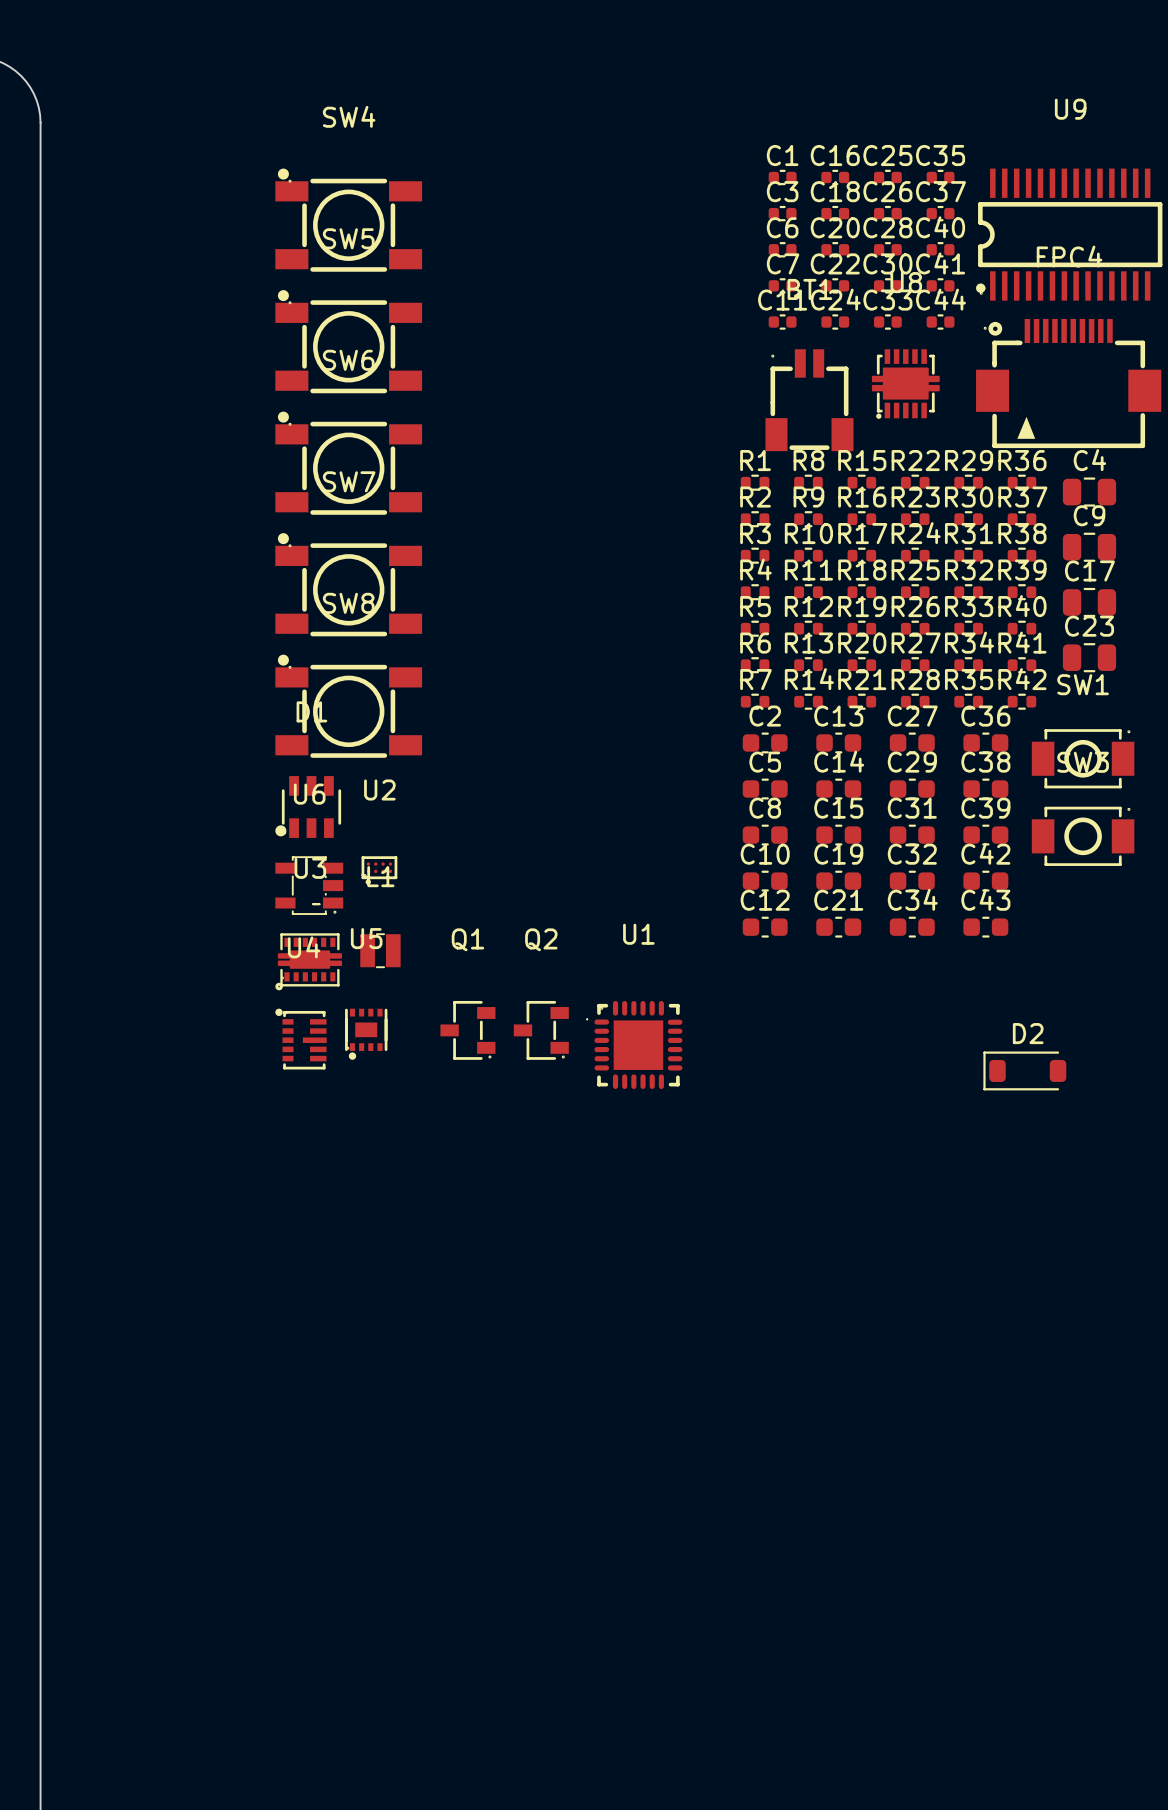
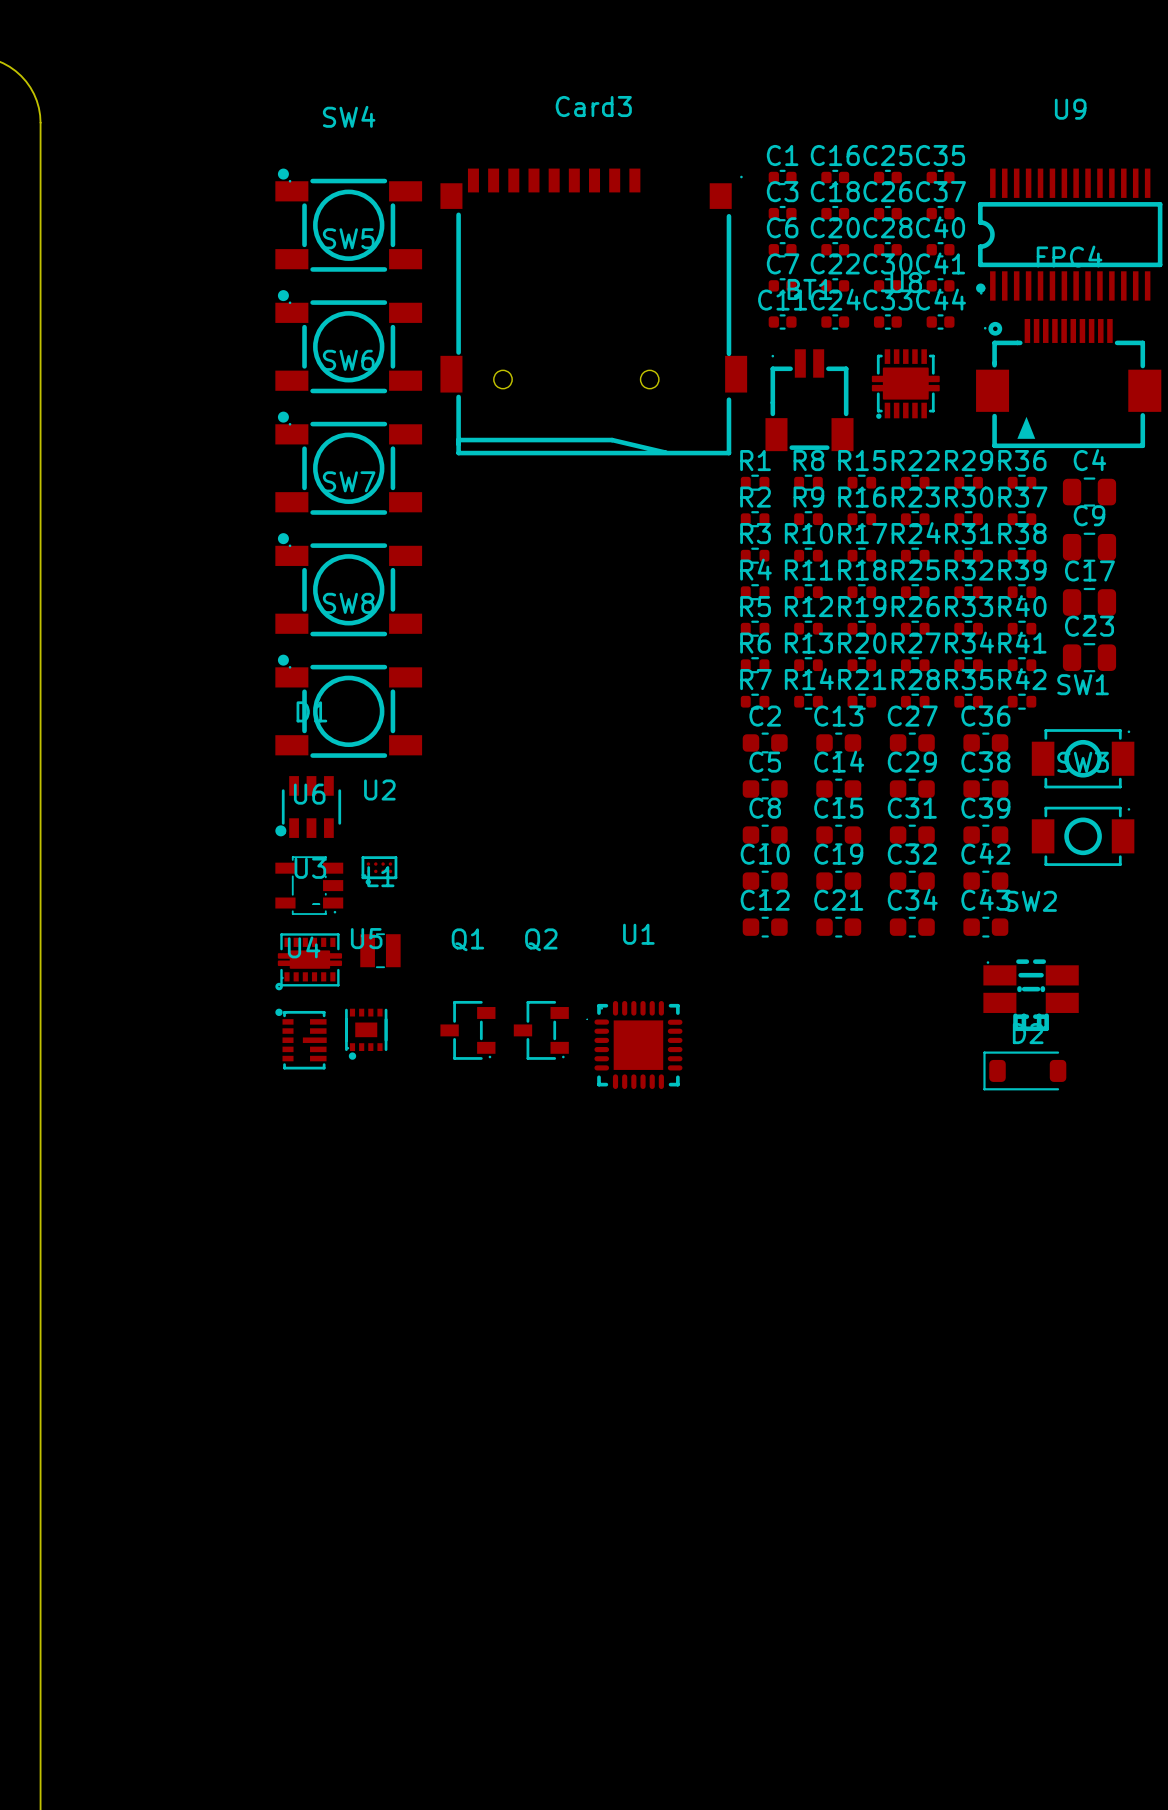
Card3: none -> (593, 311)
SW2: none -> (1031, 995)

